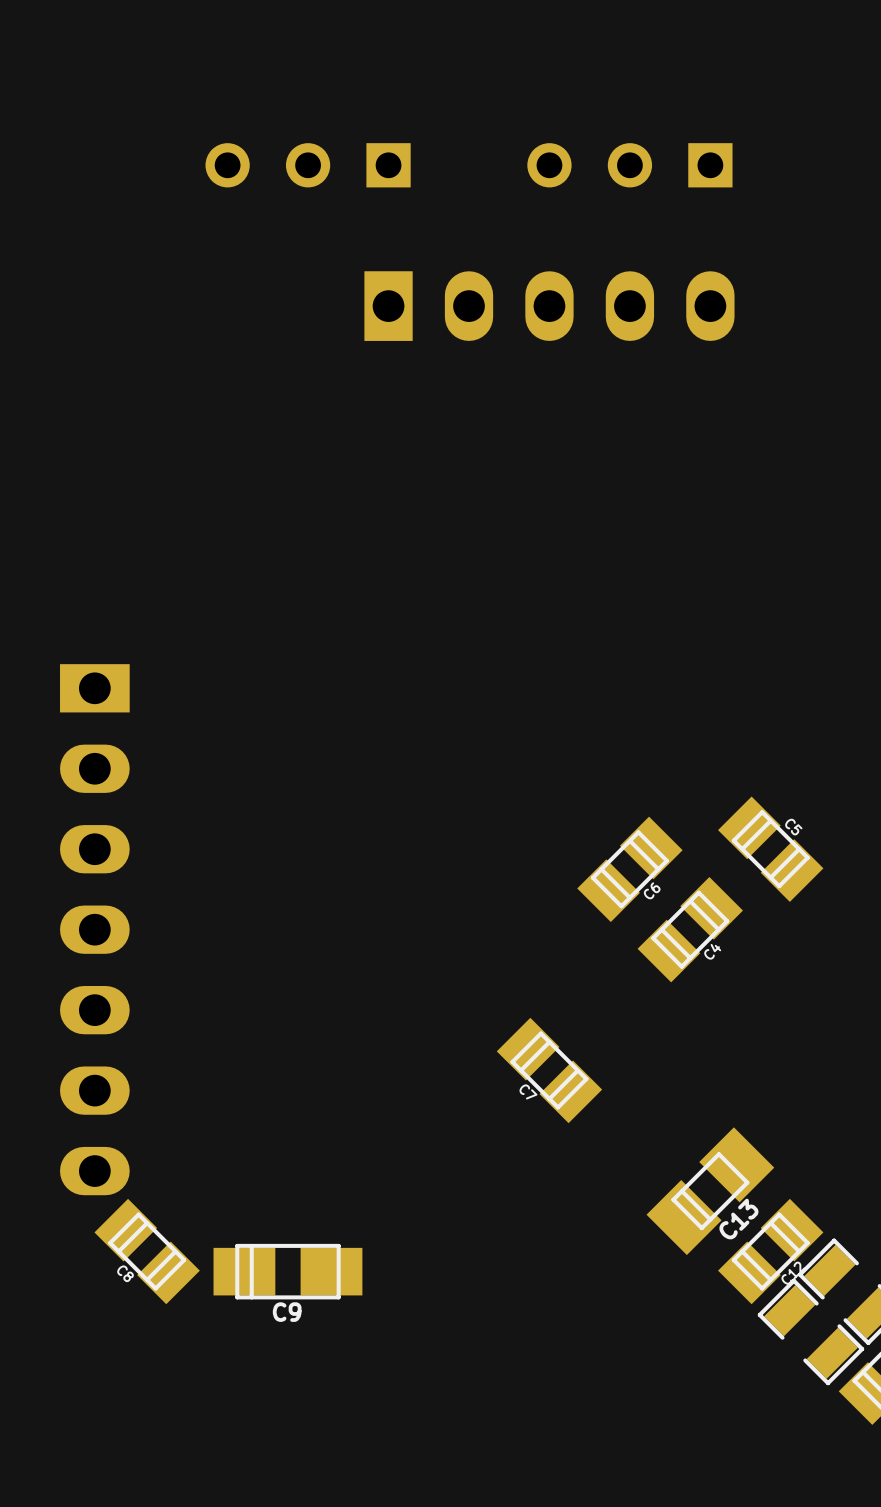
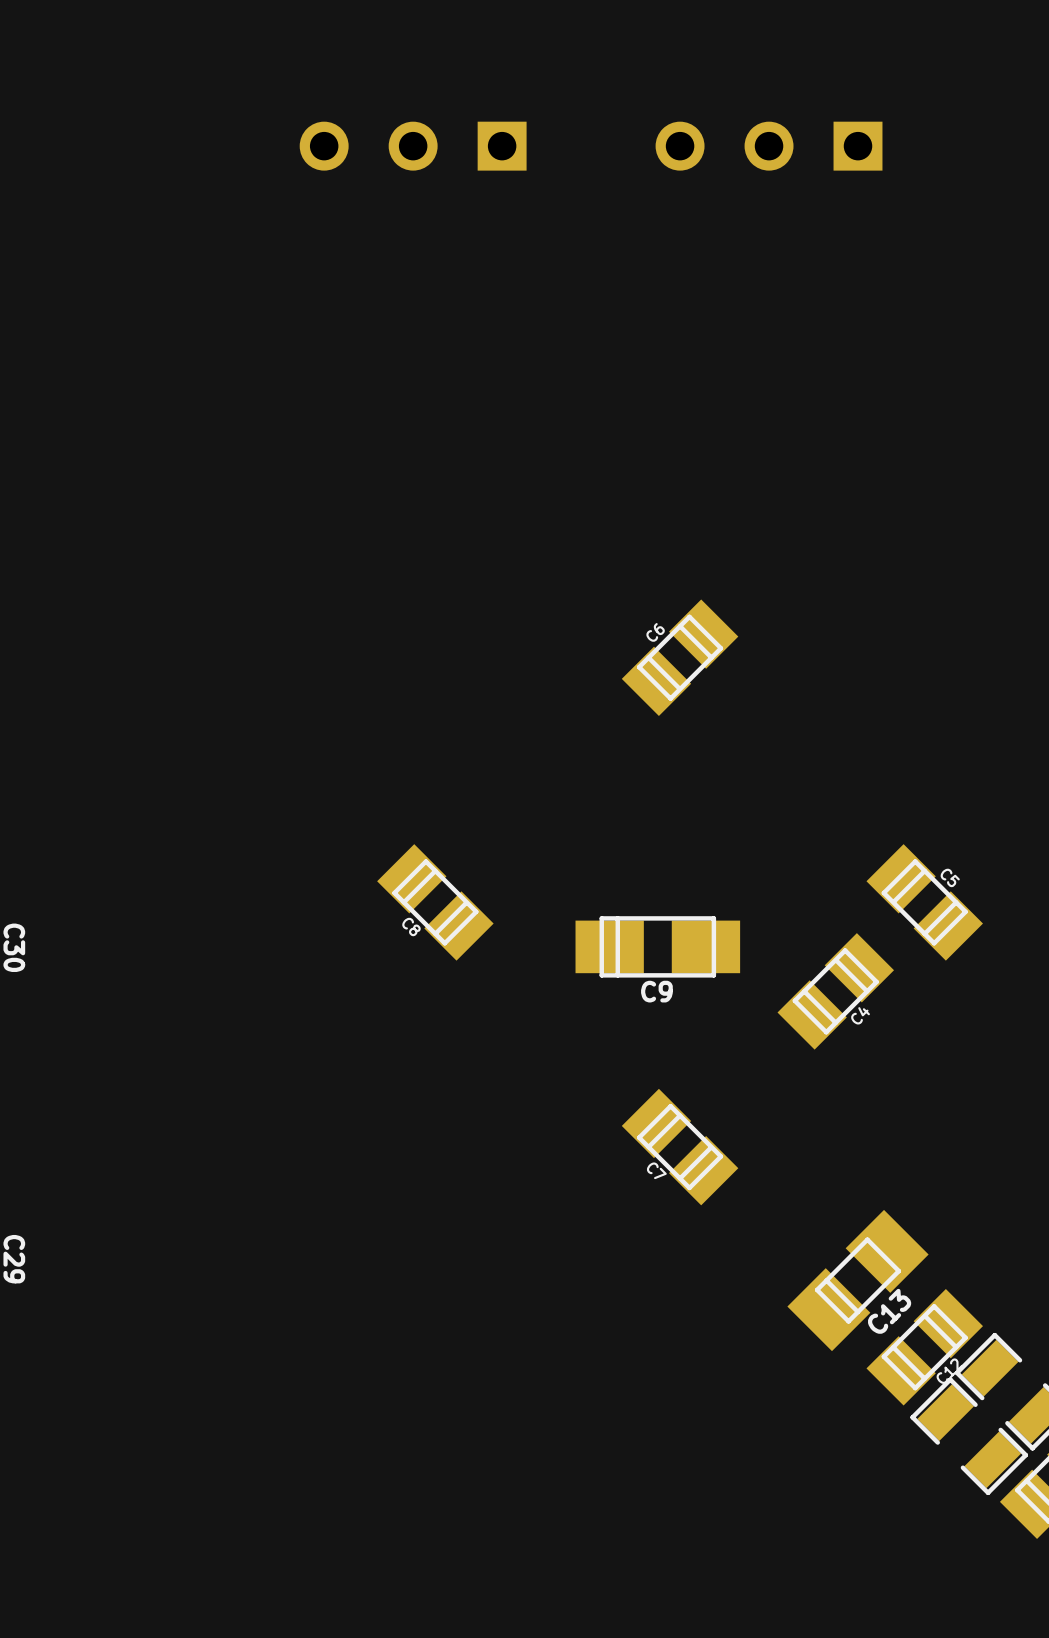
part: (549, 306) -> none
C6 rotation: 0° (629, 869) -> 180° (680, 657)
C6 position: (629, 869) -> (680, 657)
part: (94, 929) -> none
C8 position: (147, 1251) -> (435, 902)
C9 position: (287, 1271) -> (657, 946)

